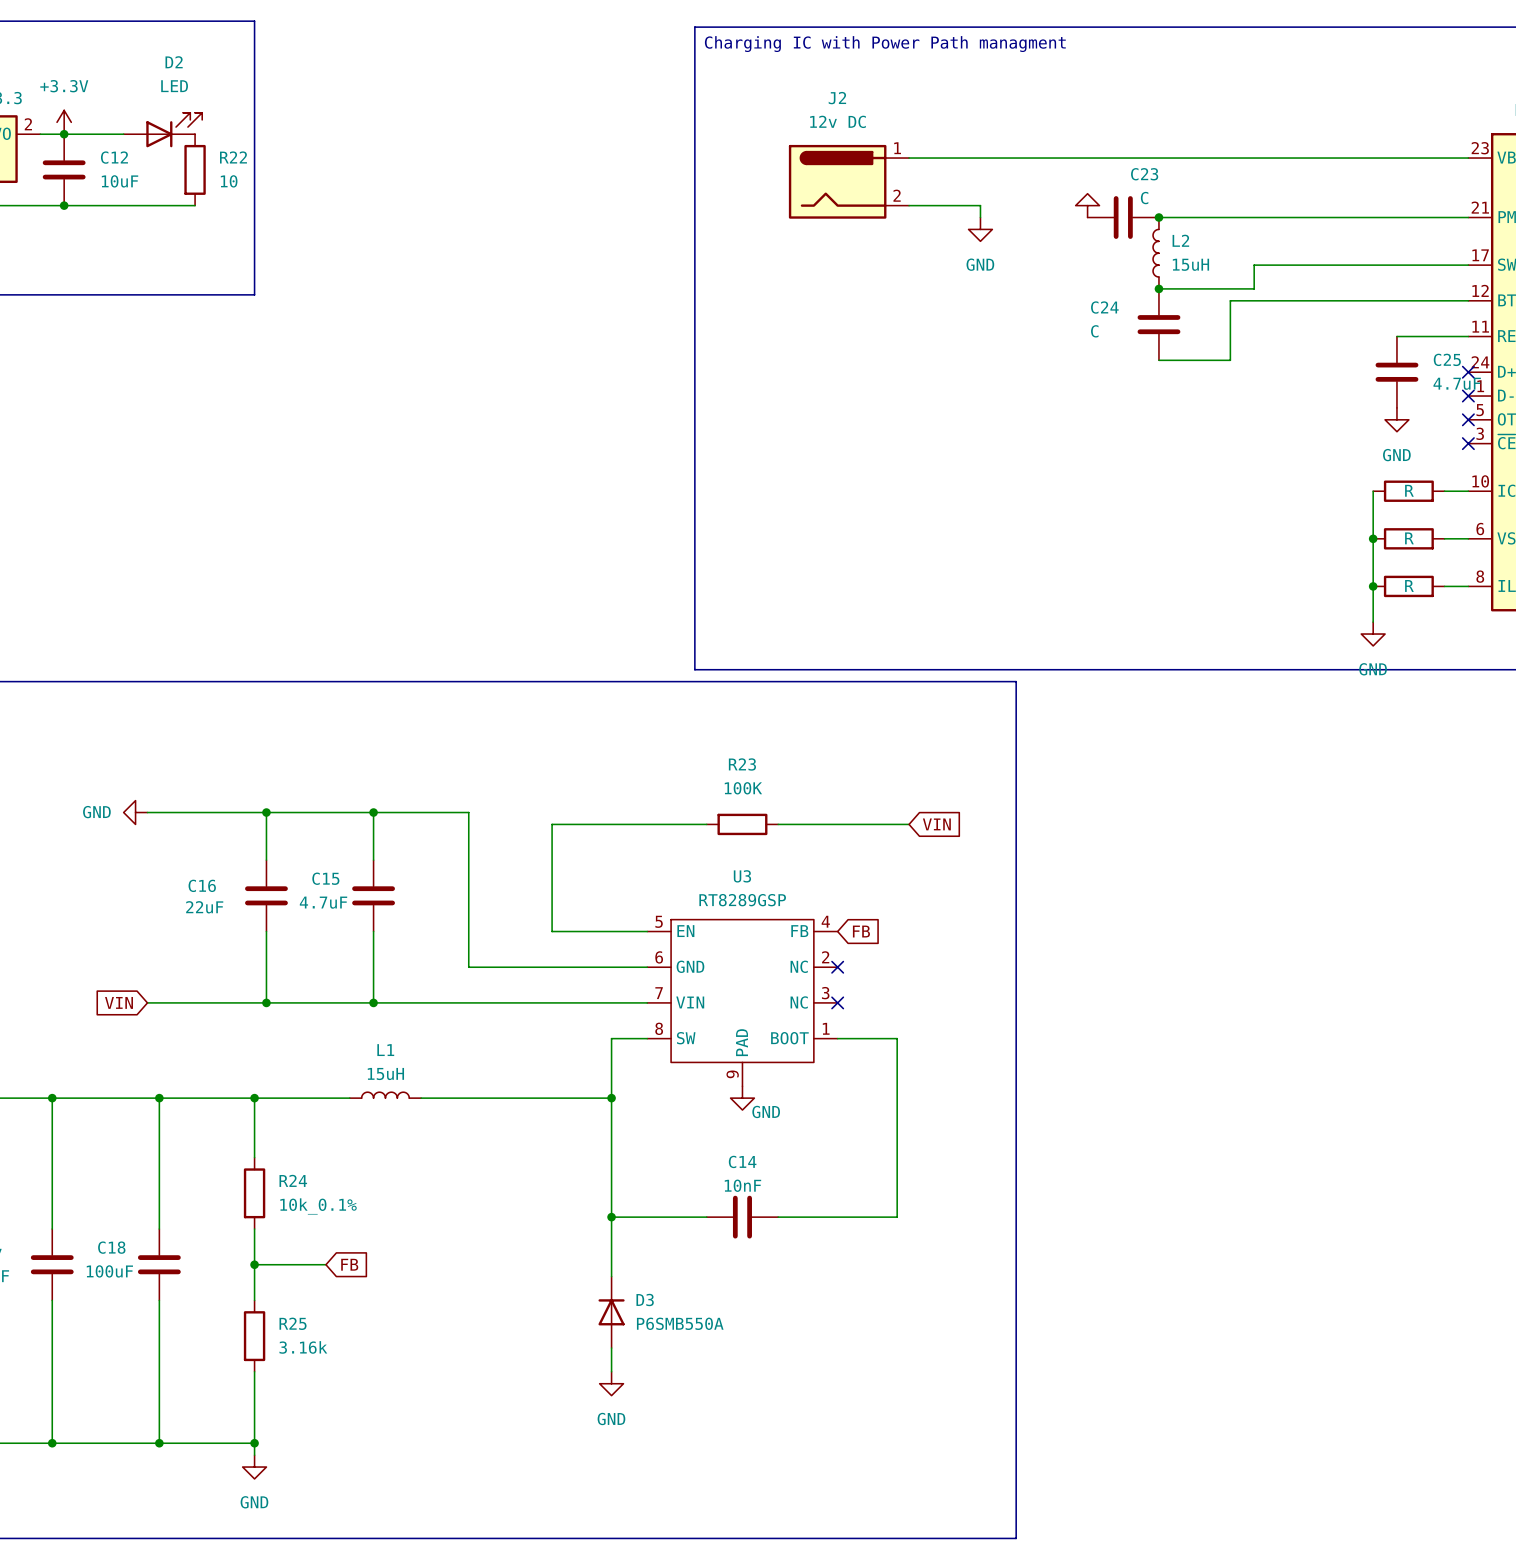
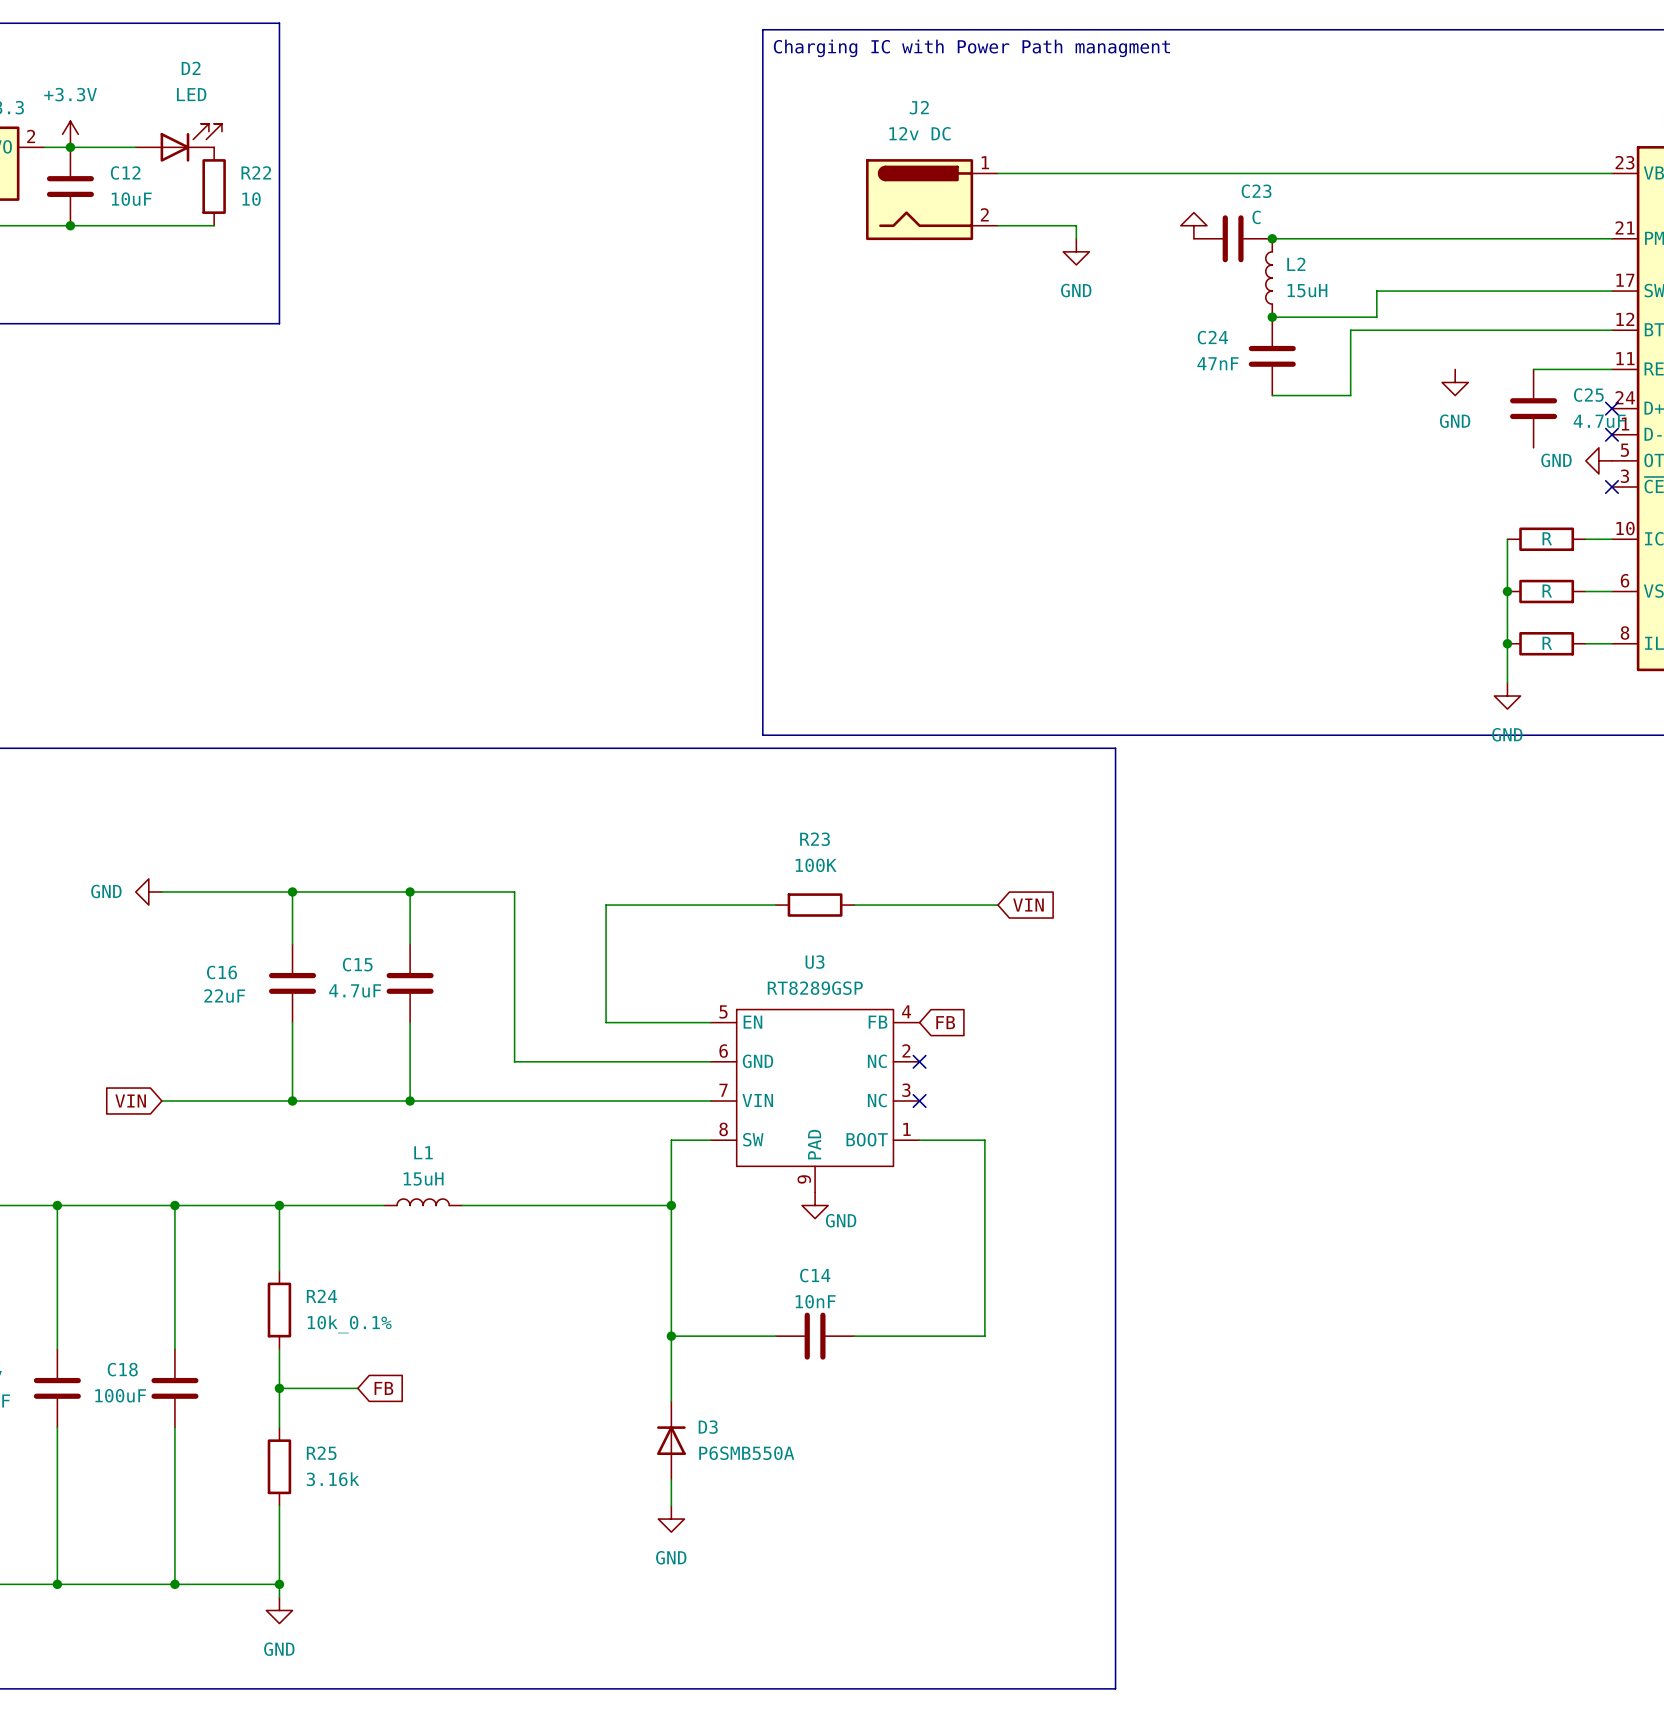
C24 value: C (1094, 331) -> 47nF (1218, 363)
power symbol: none -> GND (1455, 382)
power symbol: GND (1396, 419) -> none
power symbol: none -> GND (1598, 460)
no-connect mark: (1468, 419) -> none

